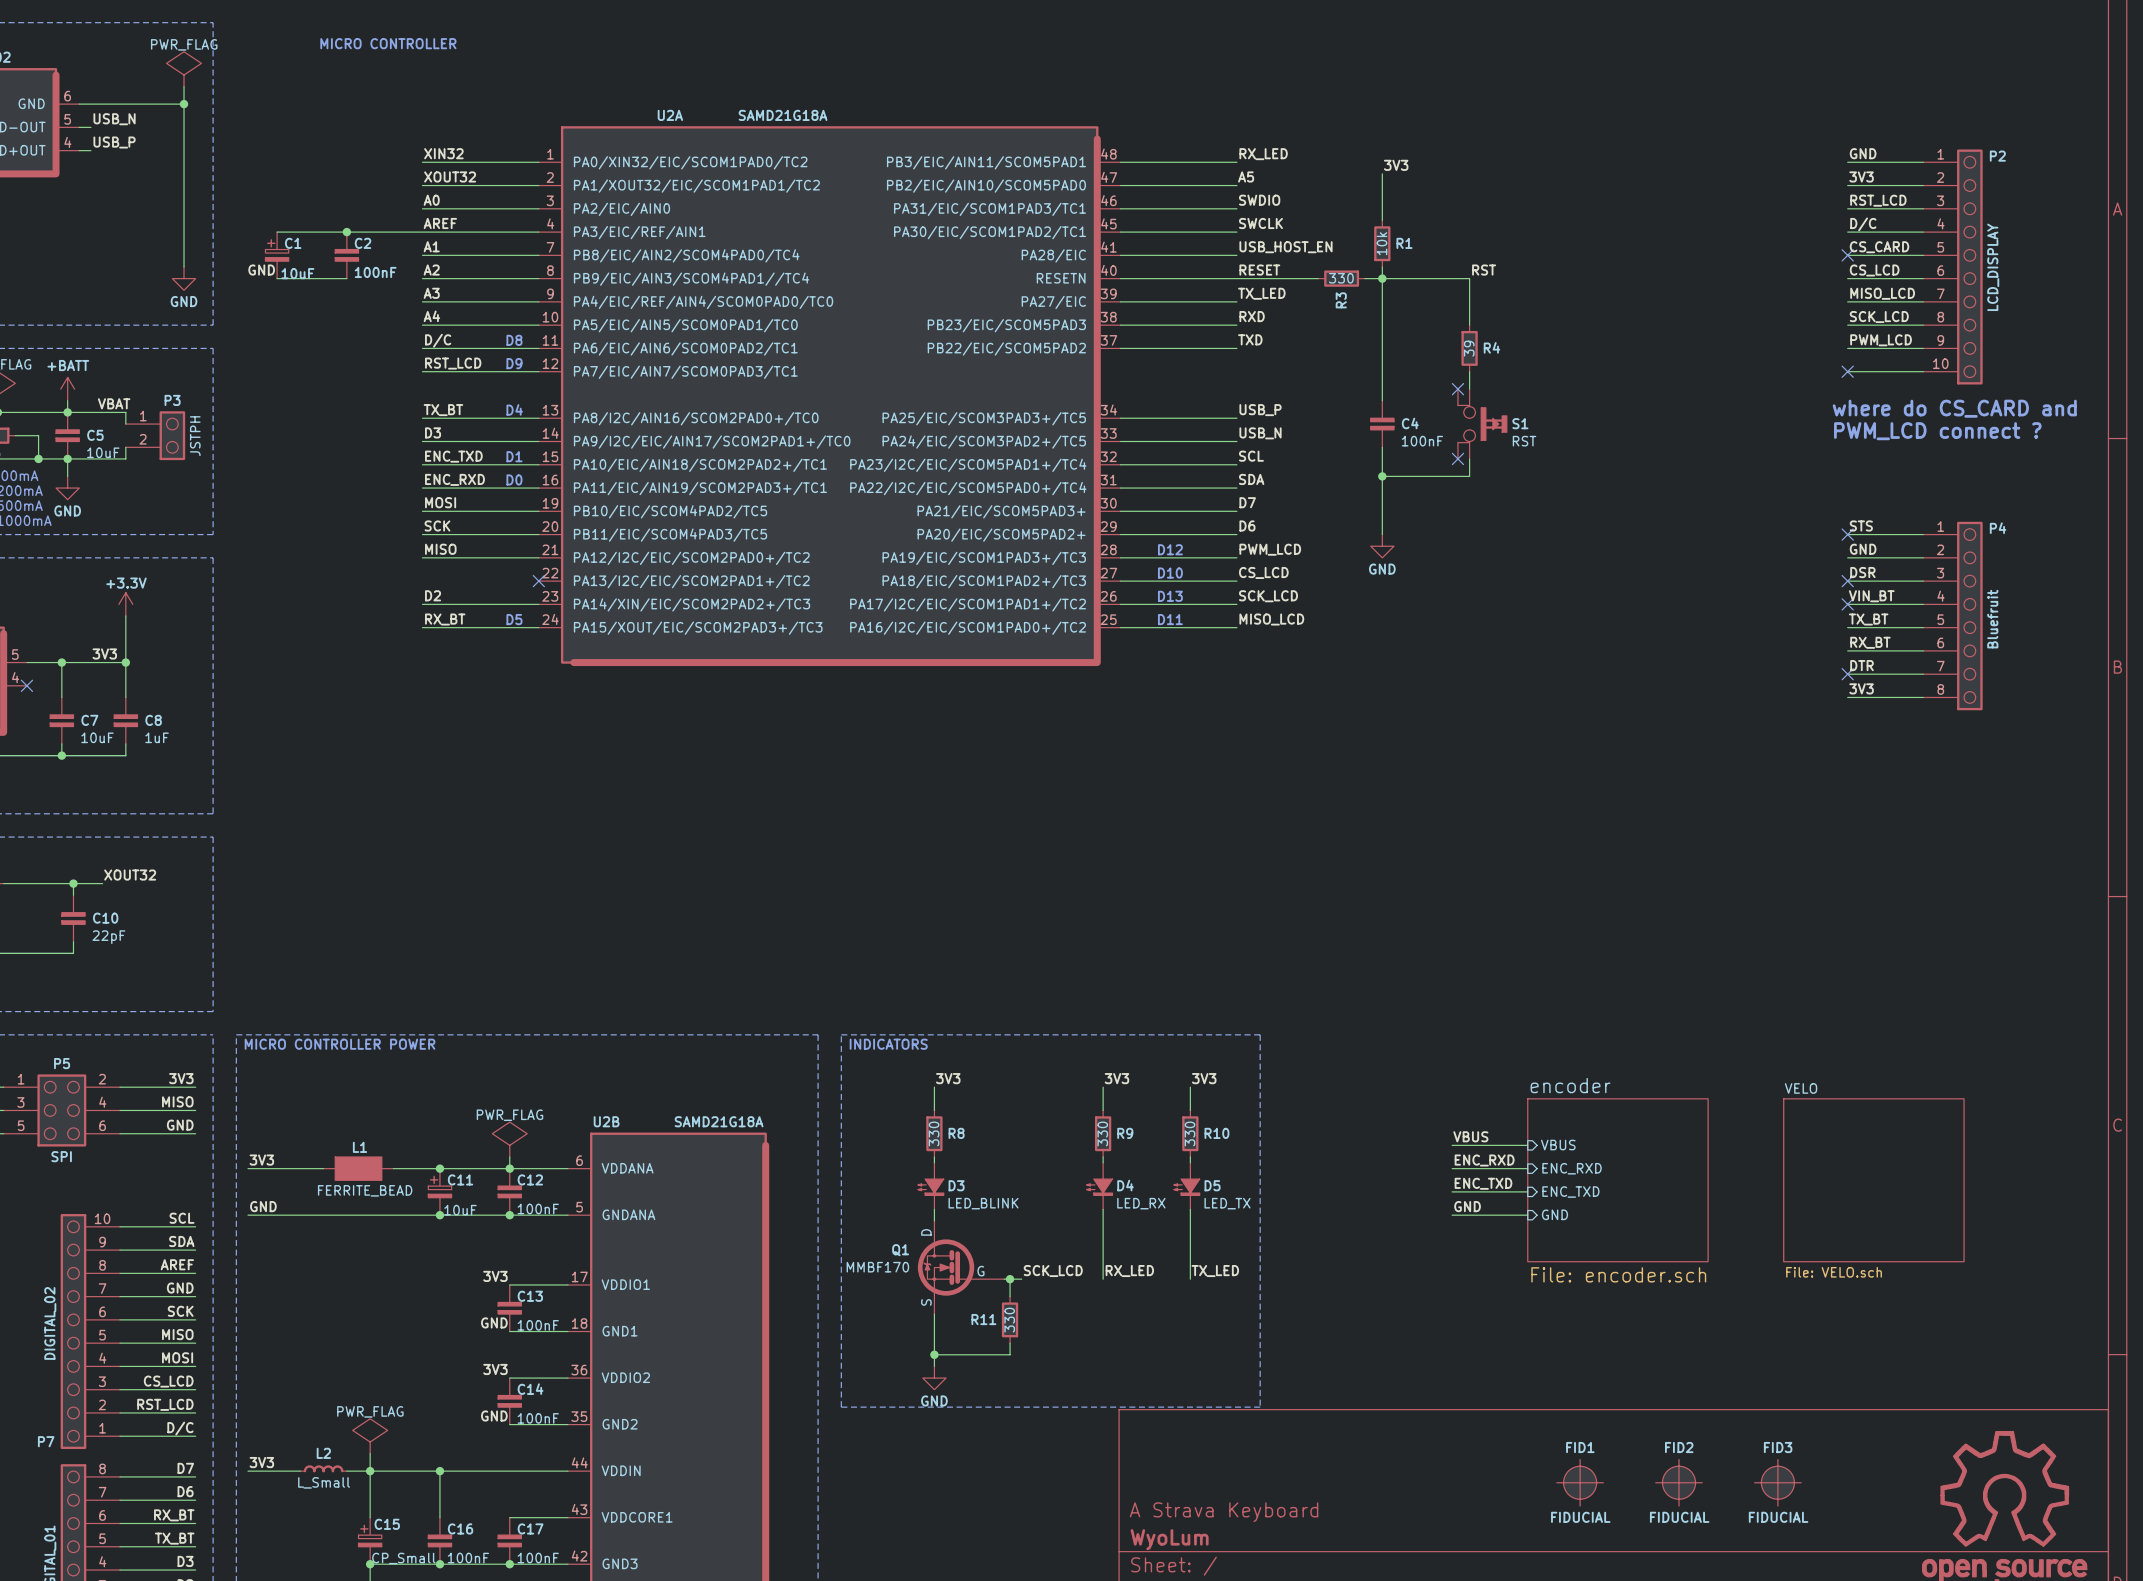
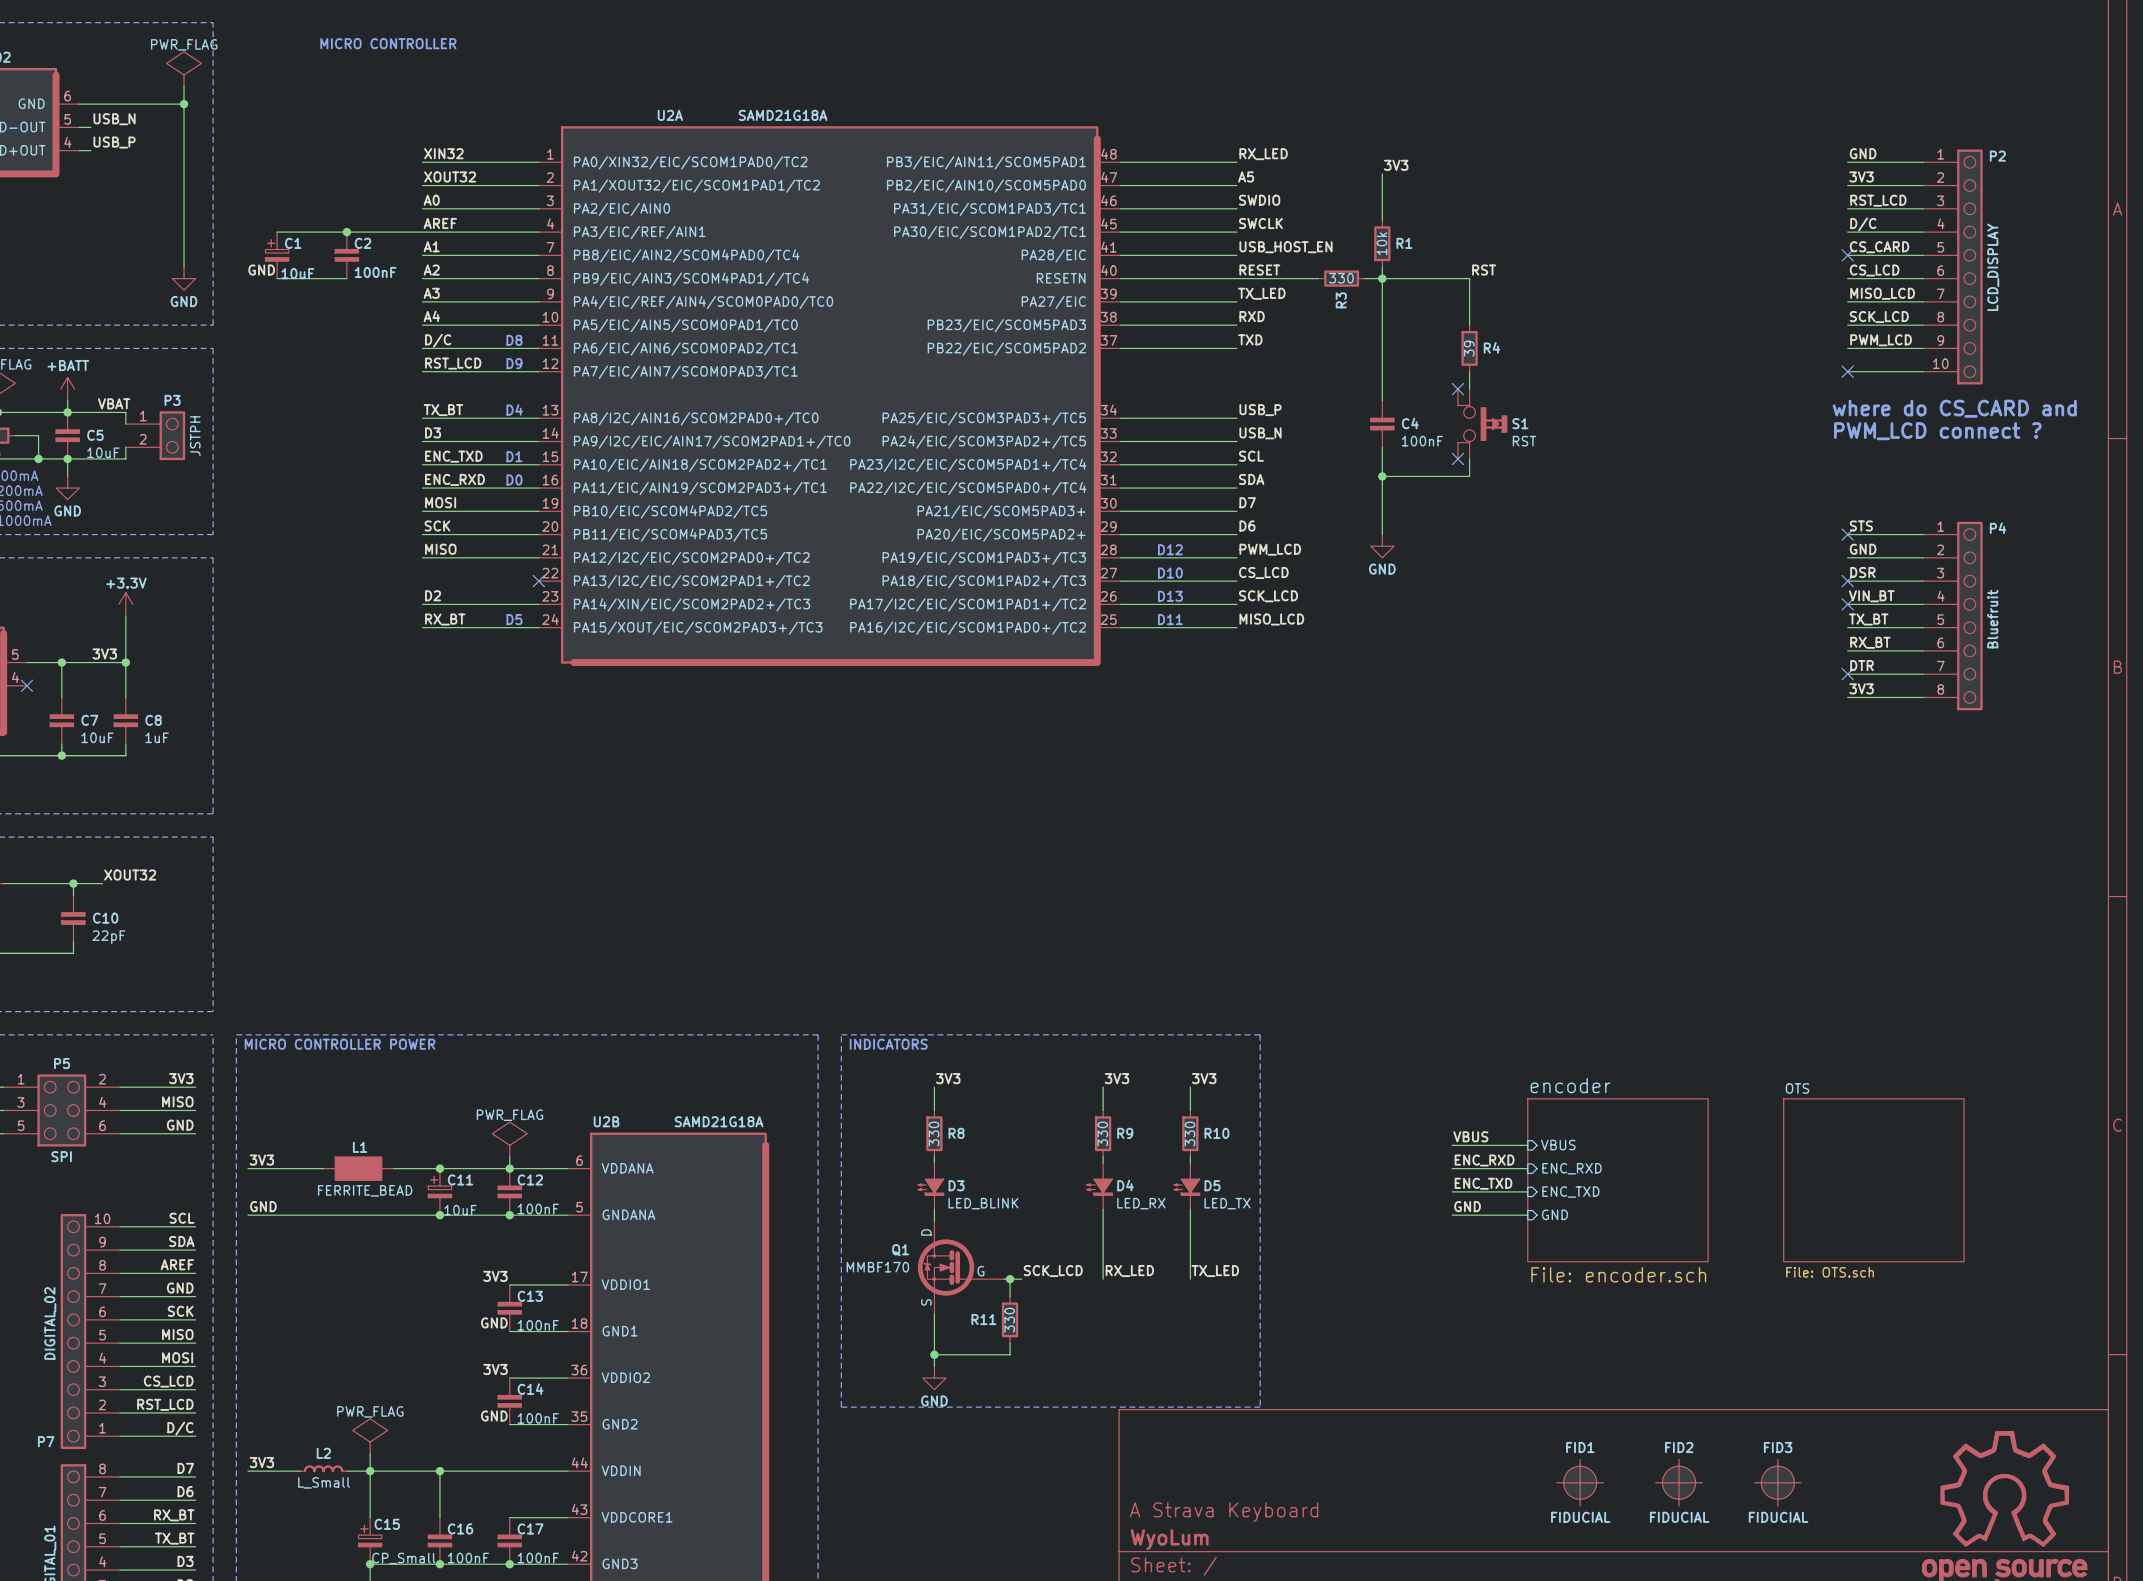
sheet VELO name: VELO (1801, 1088) -> OTS (1797, 1088)
sheet VELO value: File: VELO.sch (1834, 1272) -> File: OTS.sch (1830, 1272)

